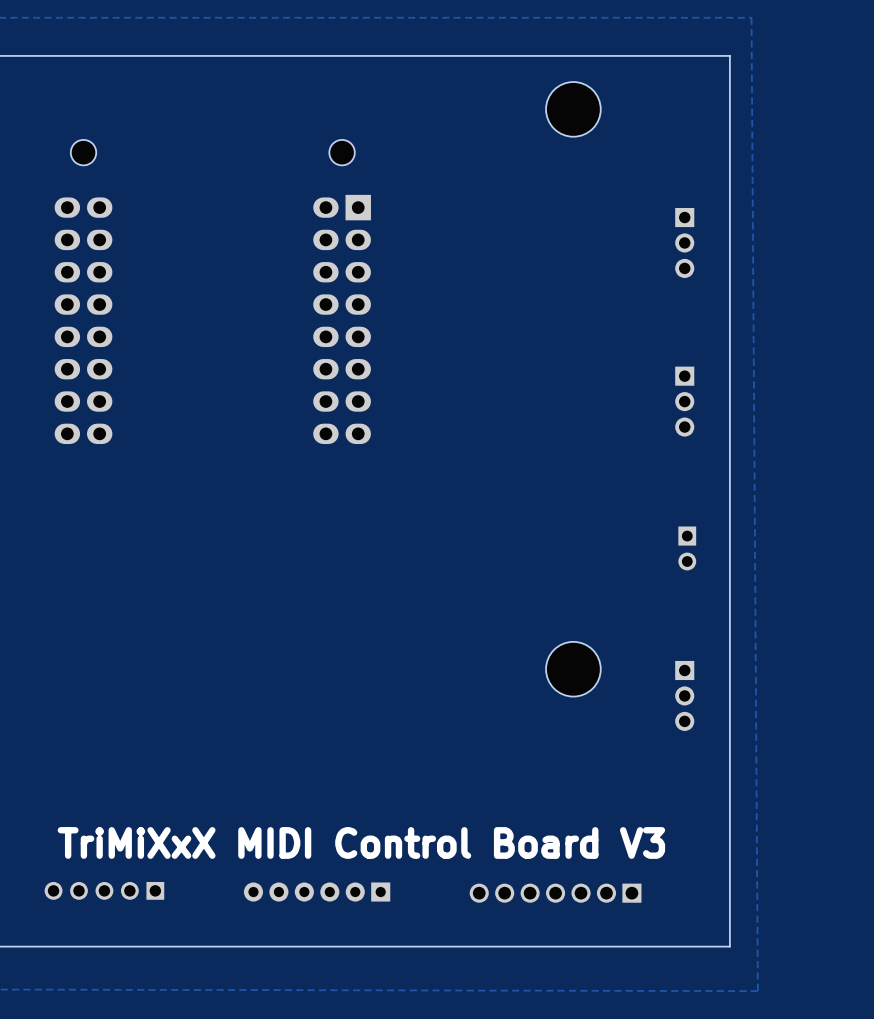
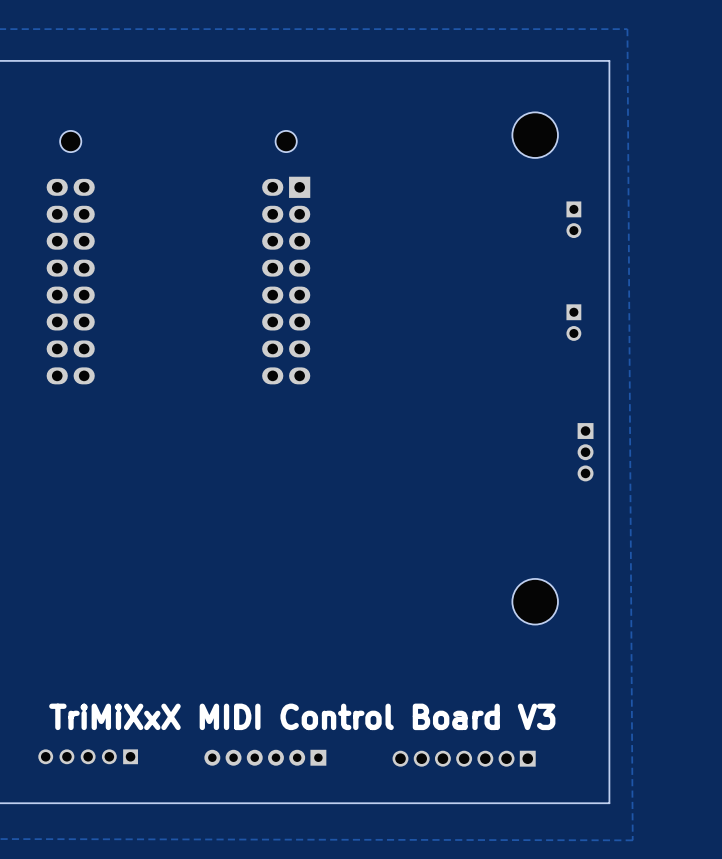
part position: (573, 109) -> (535, 135)
part footprint: [675, 207, 695, 278] -> [566, 201, 582, 239]
part: (684, 401) -> none
part: none -> (585, 452)
part position: (687, 548) -> (573, 322)
part position: (573, 669) -> (535, 601)
part: (684, 695) -> none

